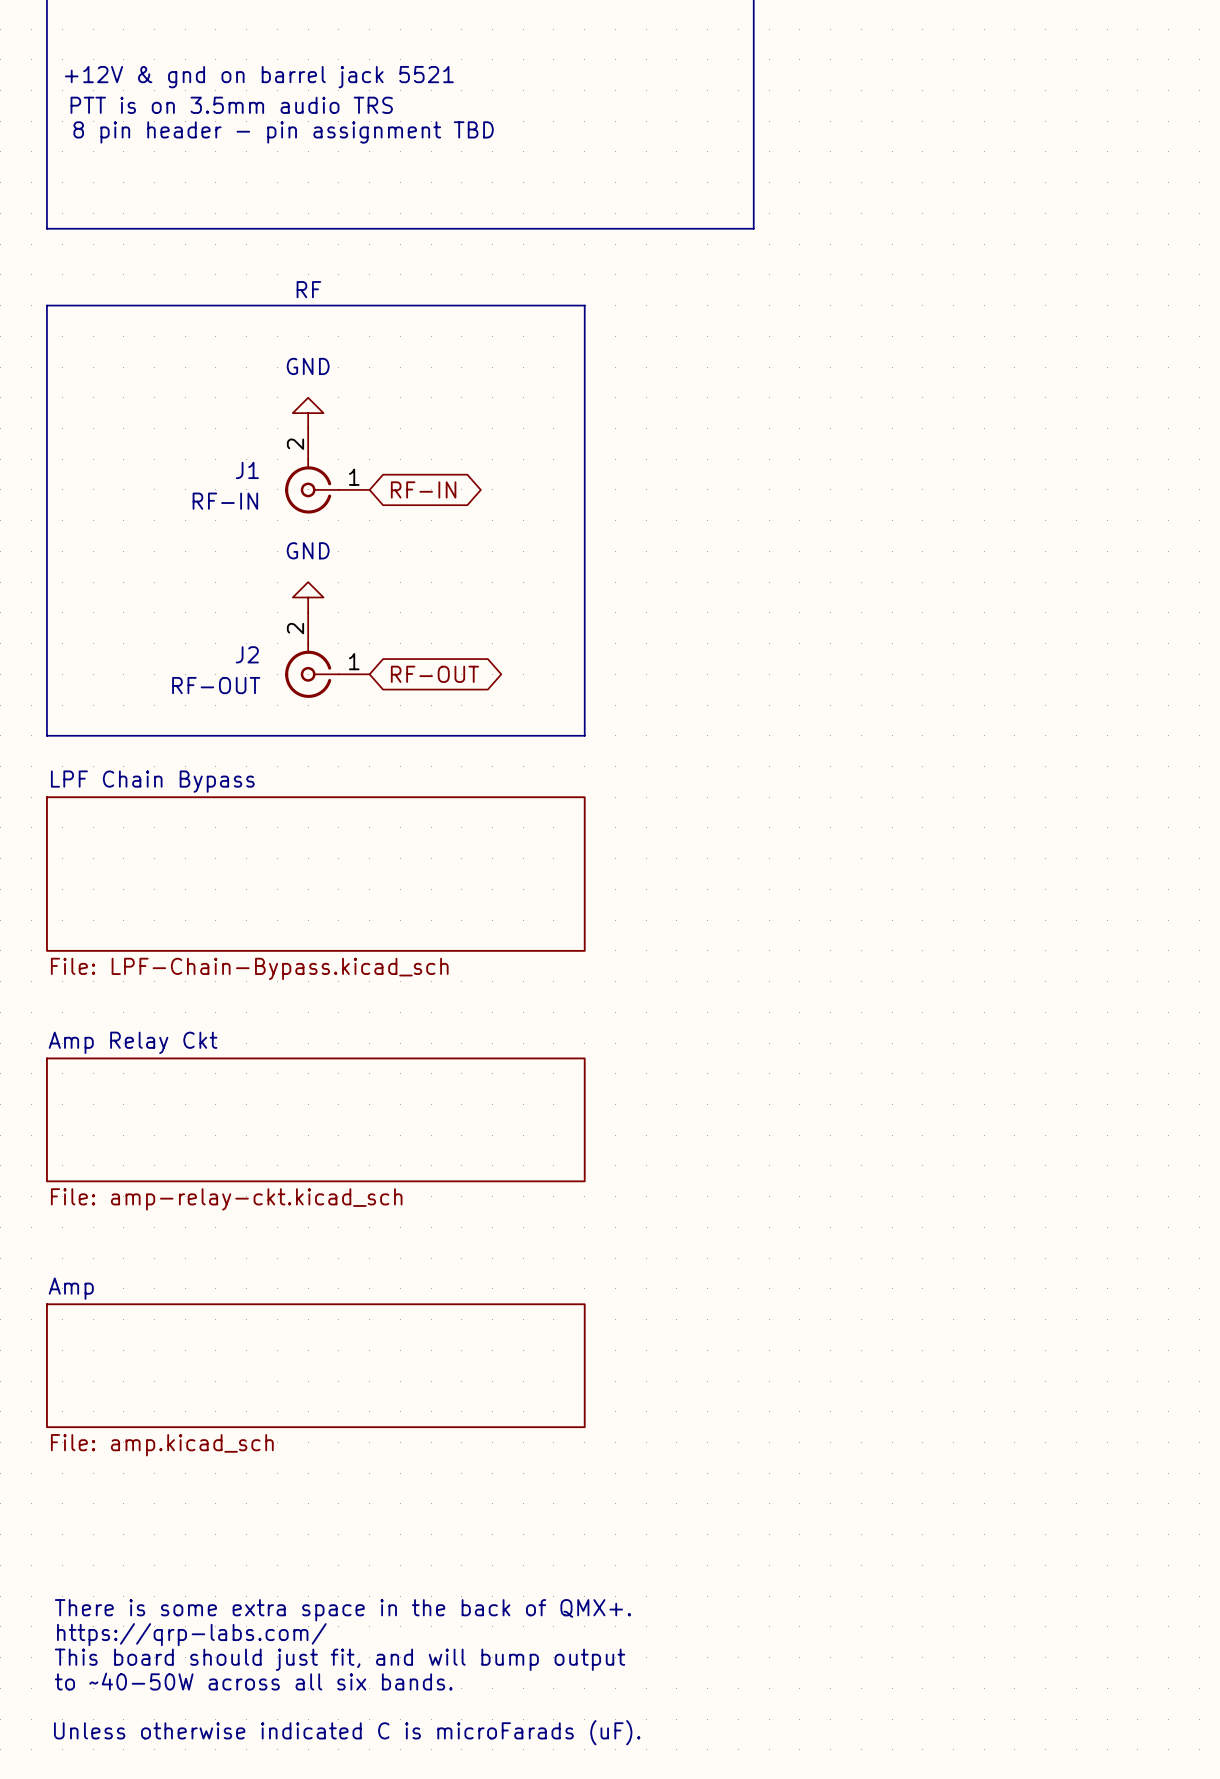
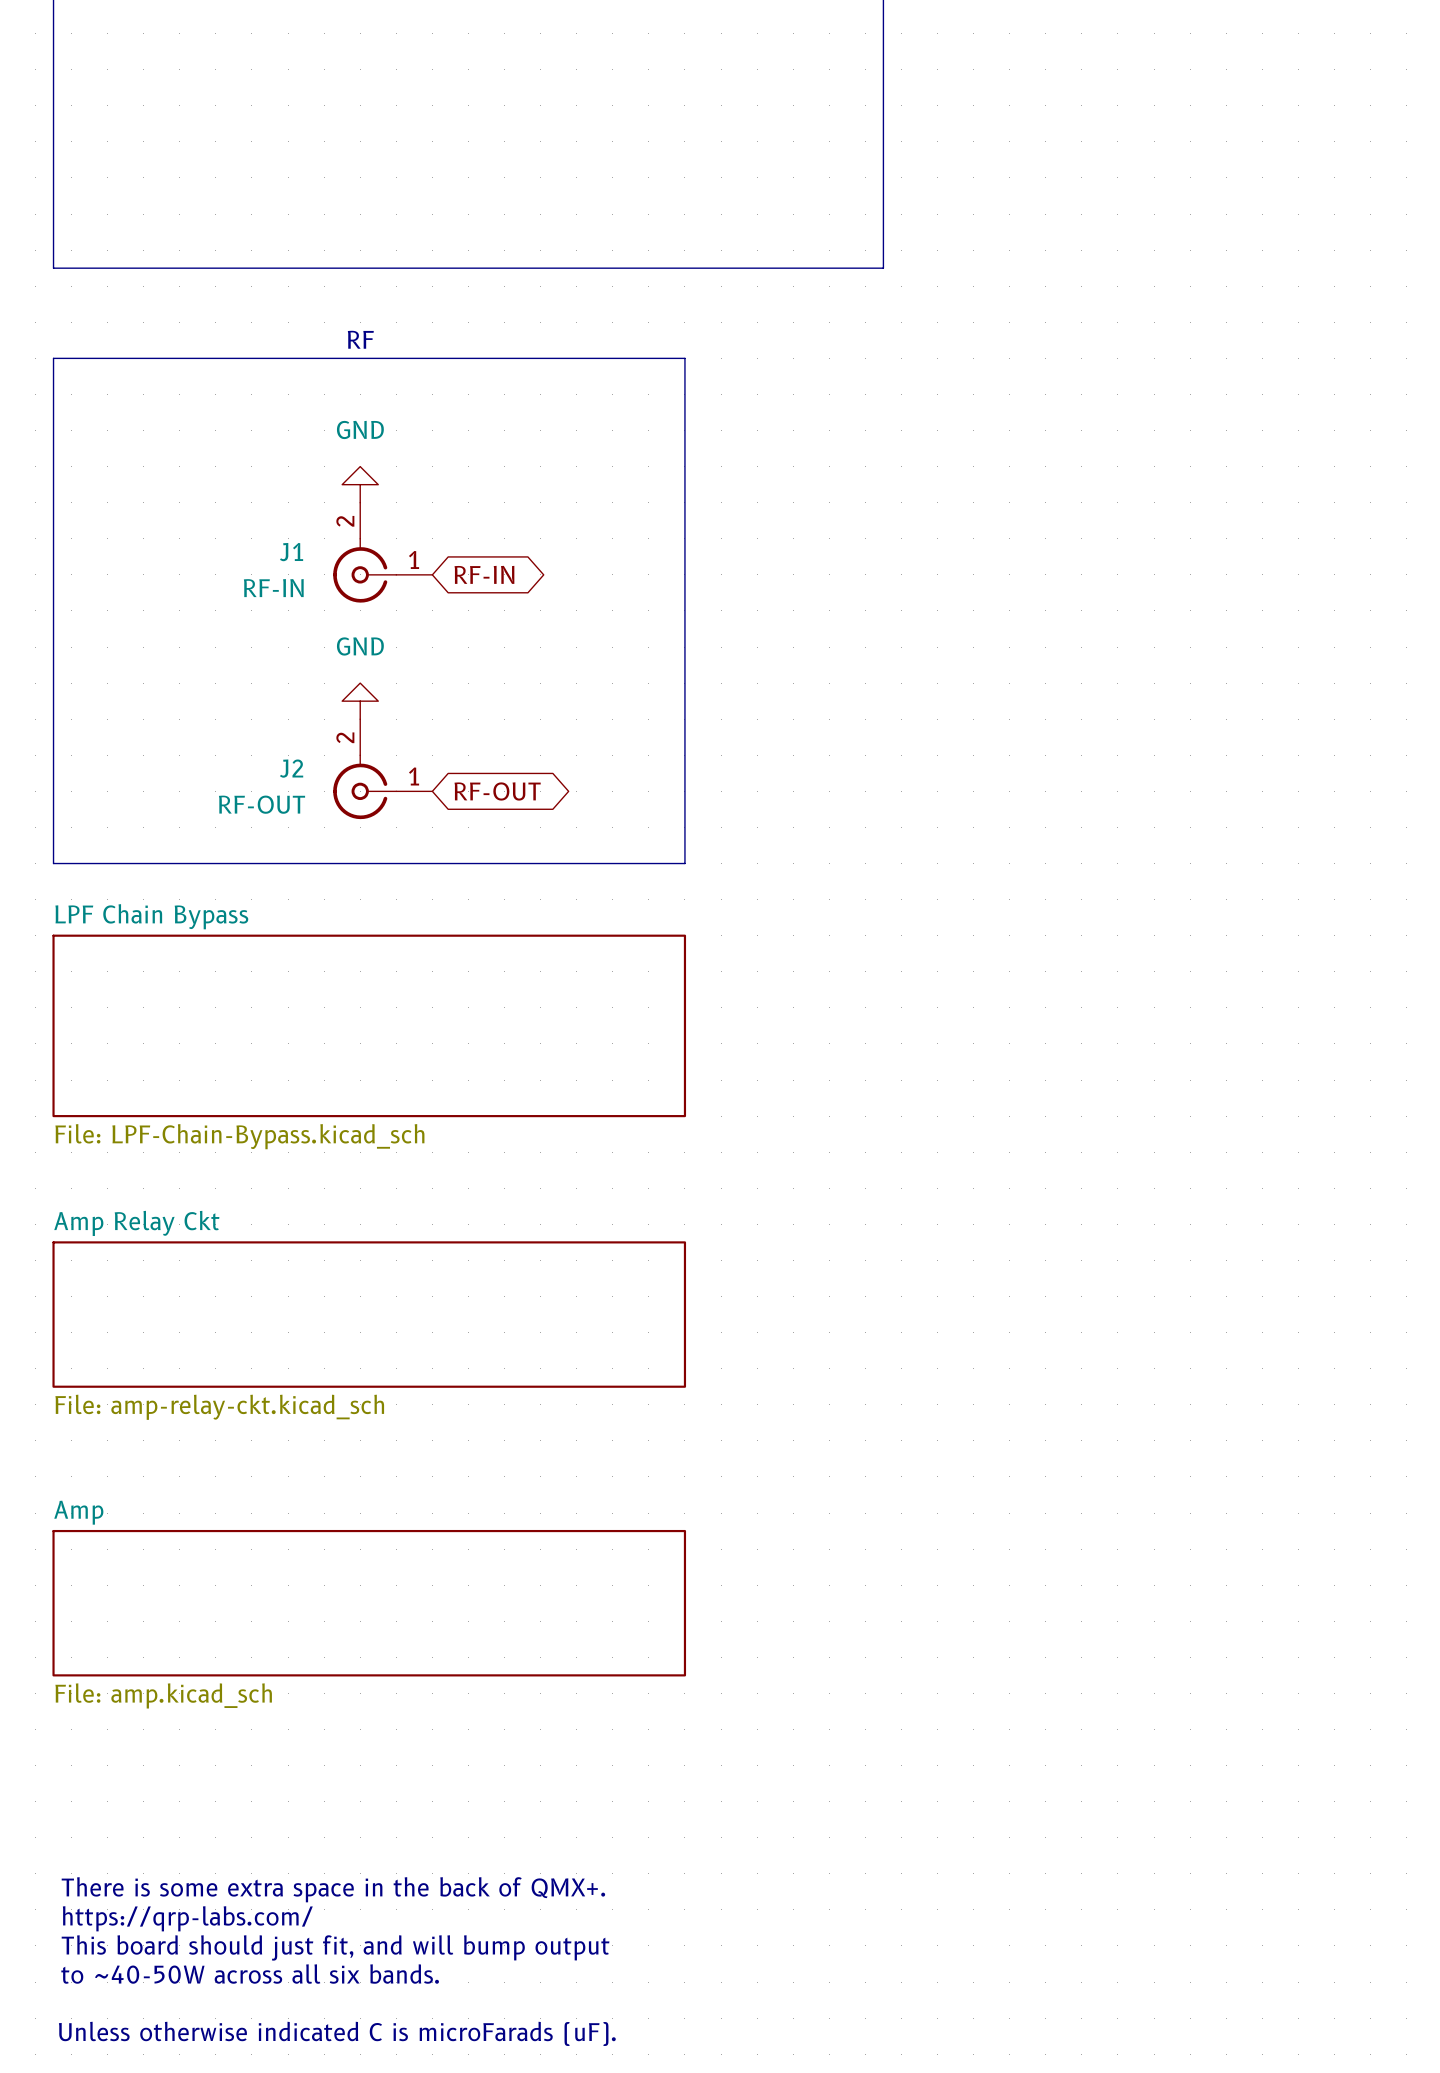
text: +12V & gnd on barrel jack 5521 (259, 77) -> none
text: PTT is on 3.5mm audio TRS (231, 105) -> none
text: 8 pin header - pin assignment TBD (283, 132) -> none

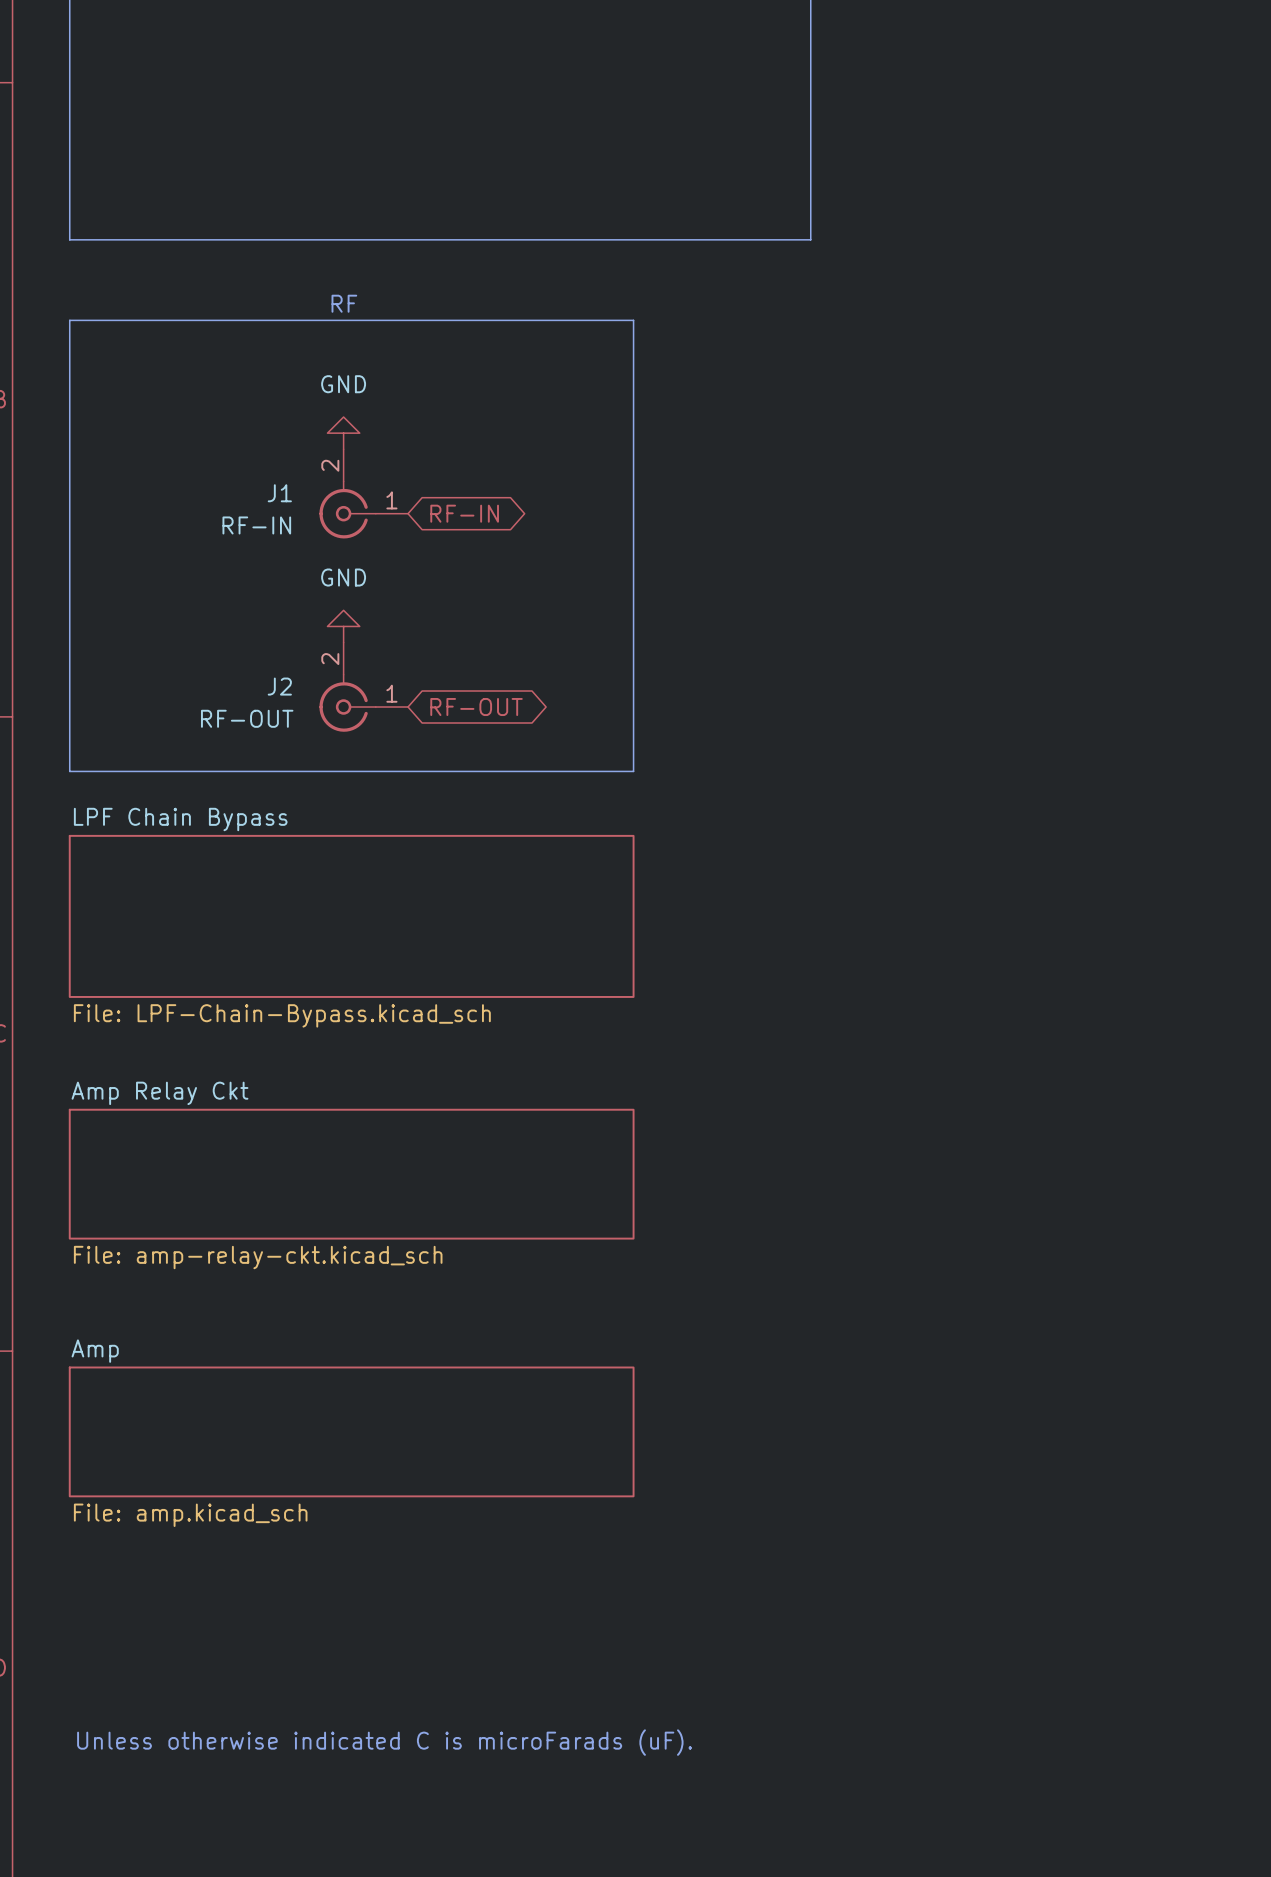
text: There is some extra space in the back of QMX+. (333, 1889) -> none
text: https://qrp-labs.com/ (187, 1918) -> none
text: This board should just fit, and will bump output (335, 1947) -> Unless otherwise indicated C is microFarads (uF). (384, 1742)
text: to ~40-50W across all six bands. (250, 1974) -> none
text: Unless otherwise indicated C is microFarads (uF). (337, 2033) -> none

